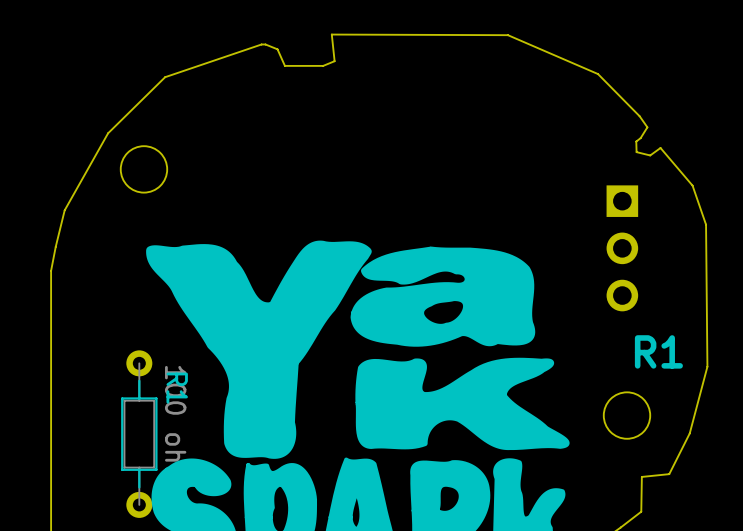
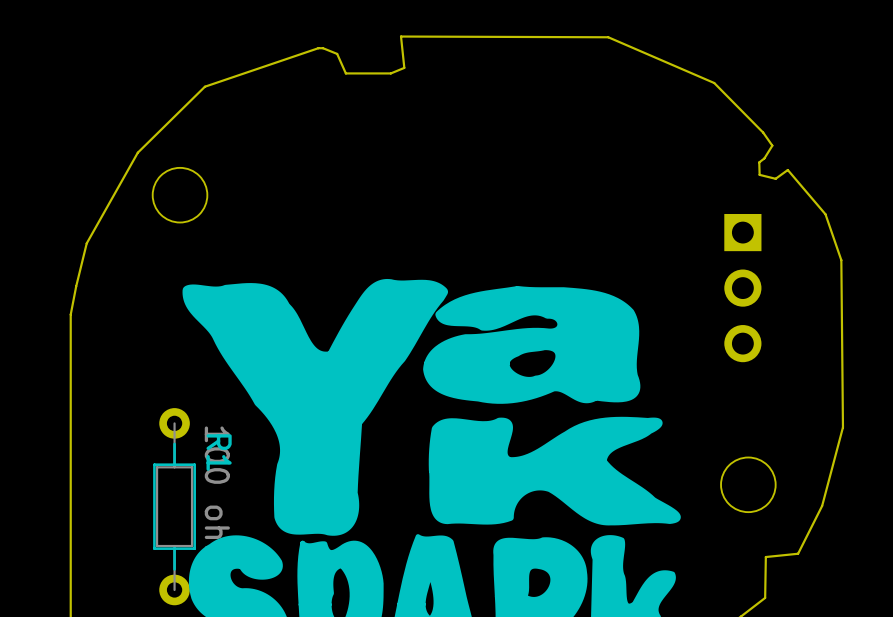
text: R1 (658, 351) -> none

